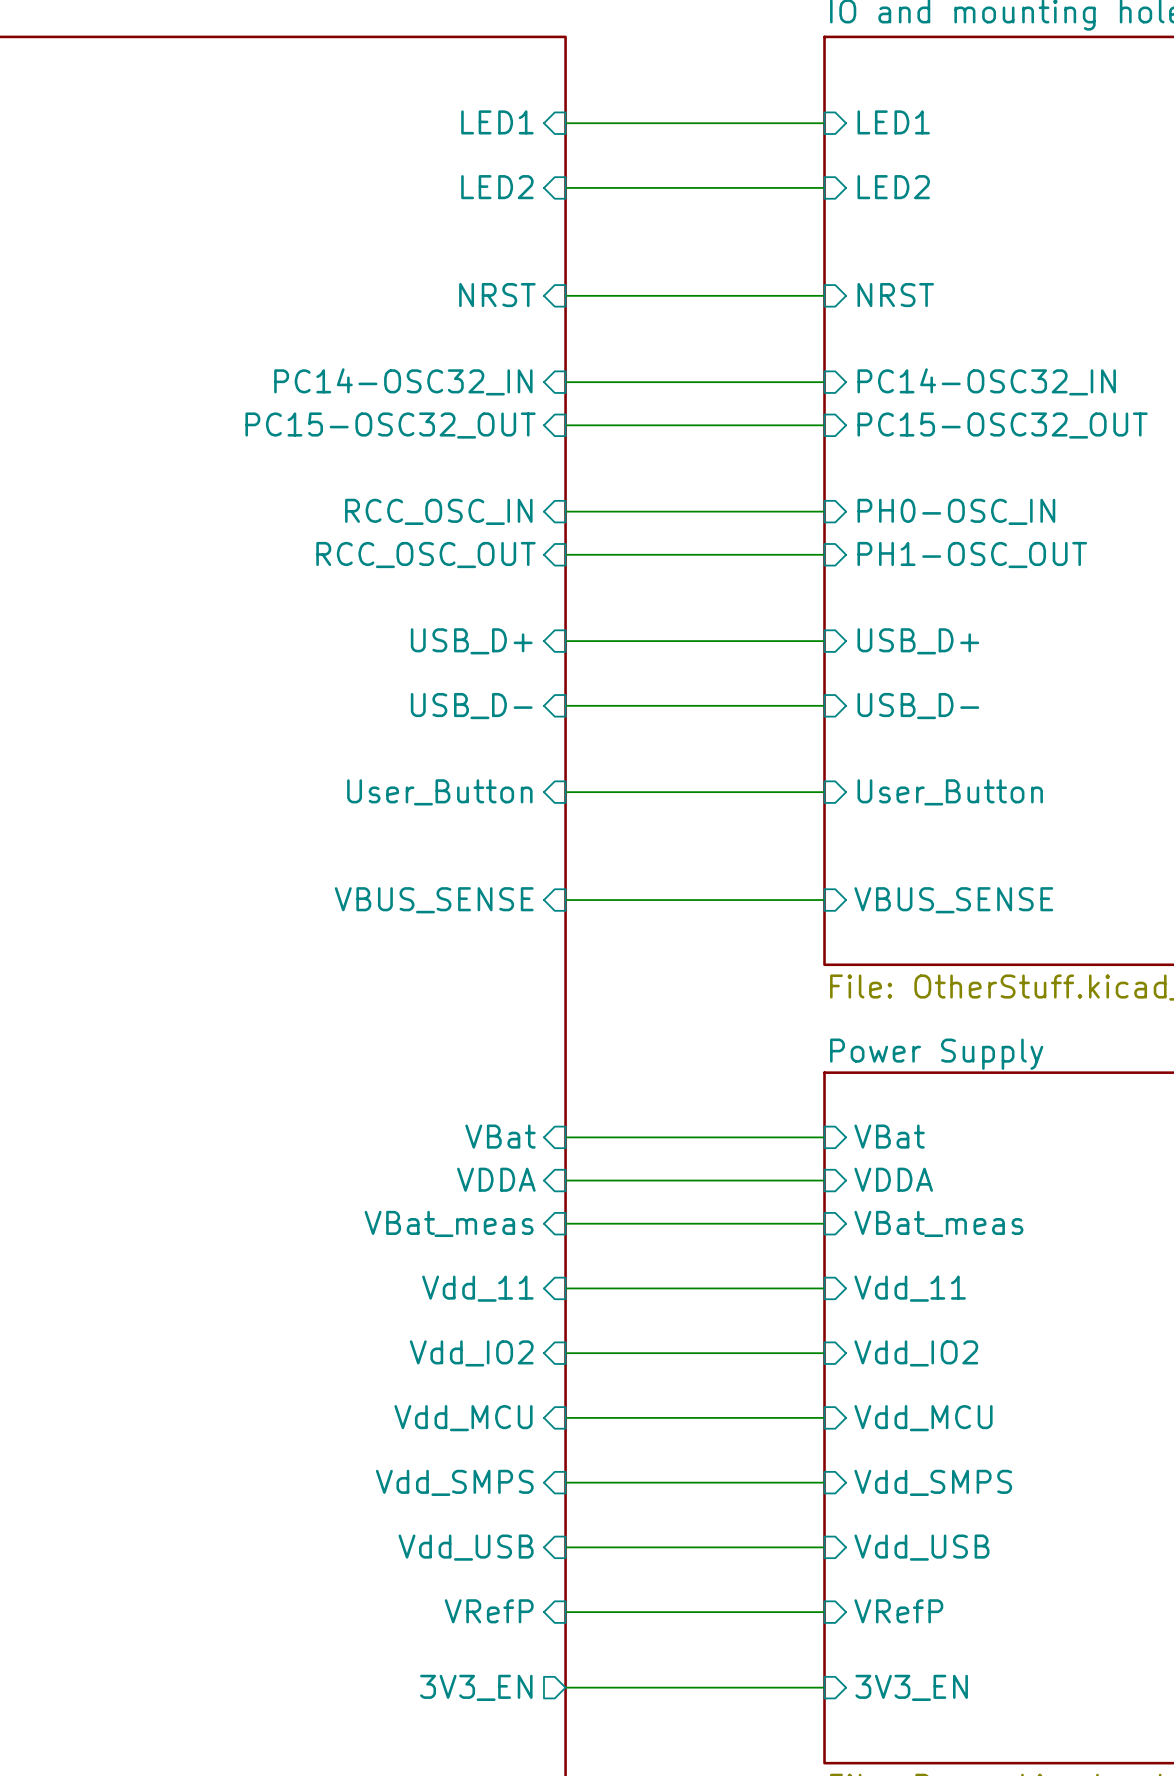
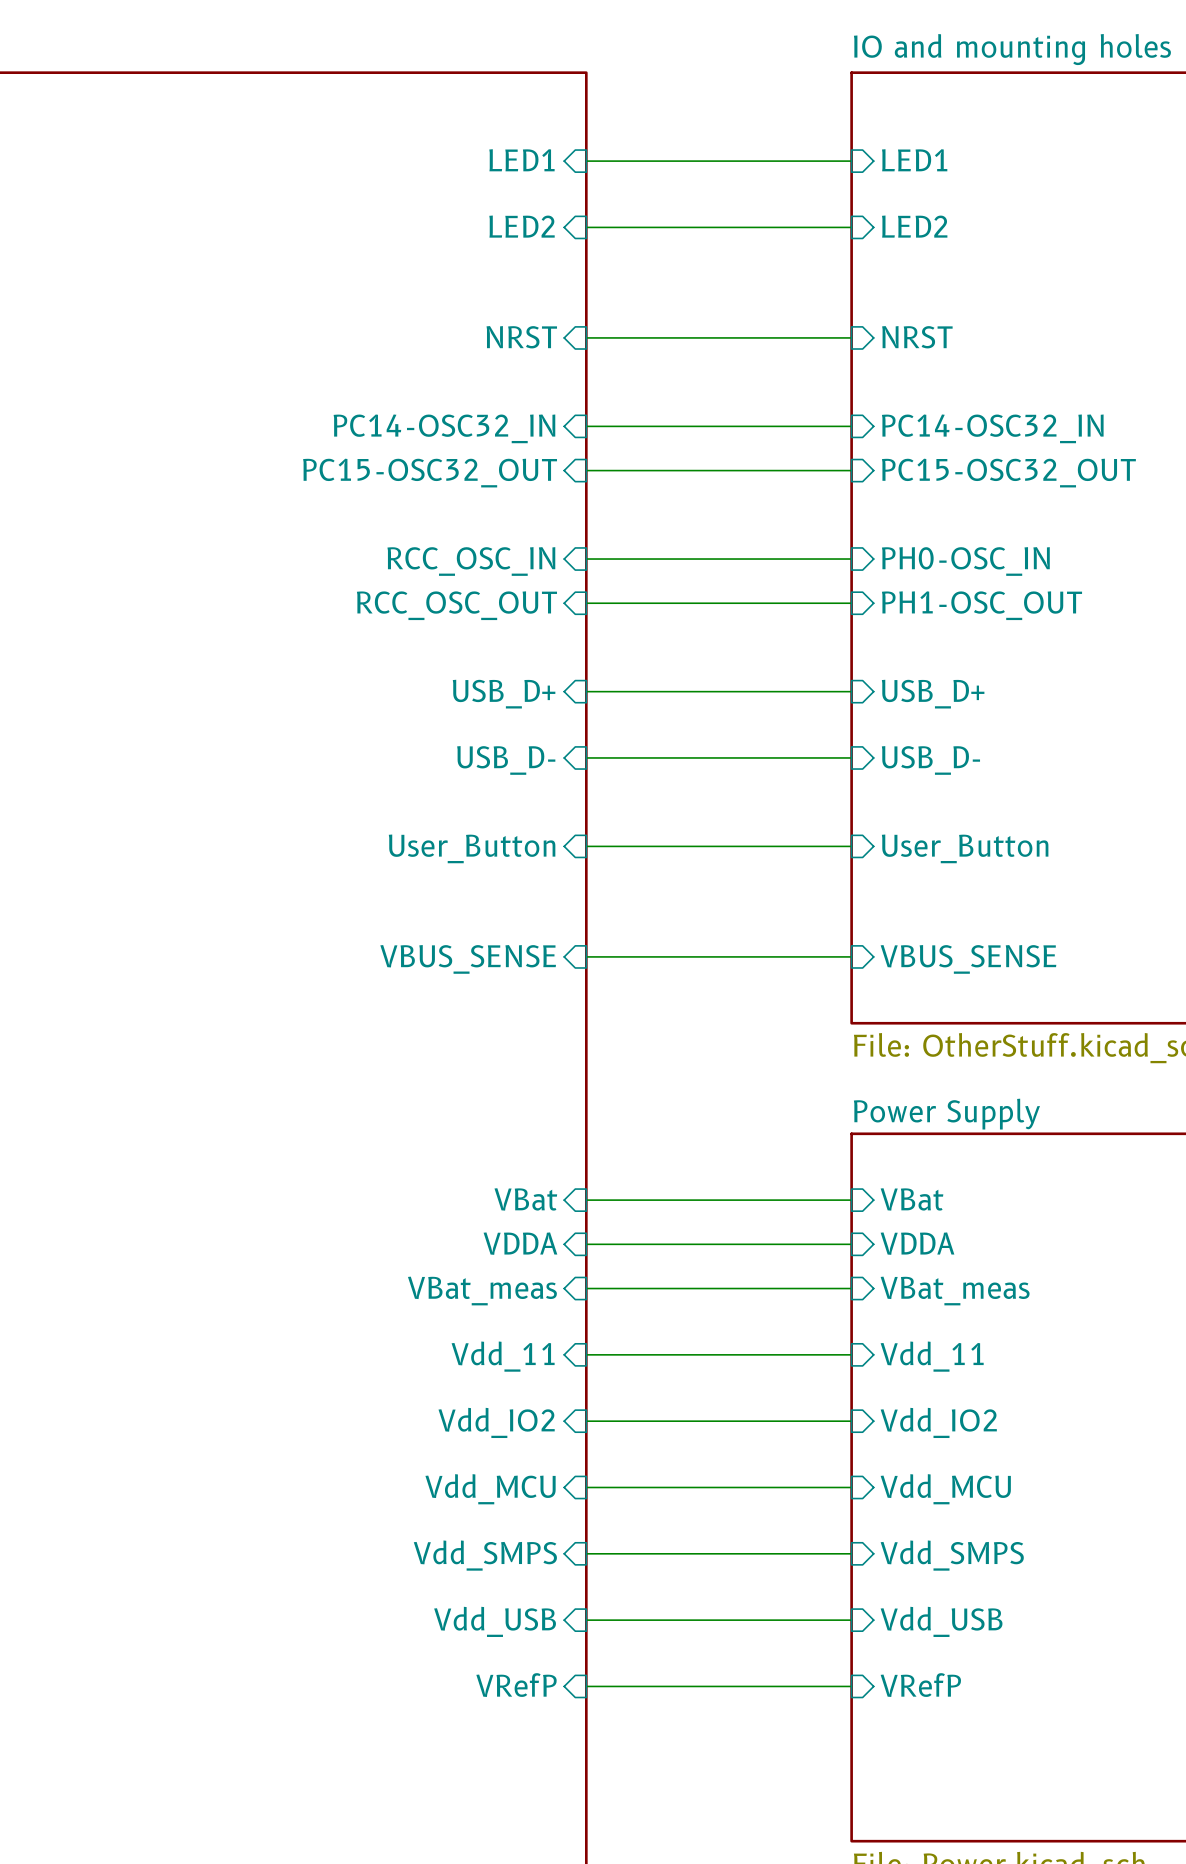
sheet pin: 3V3_EN (476, 1687) -> none
wire: (565, 1687) (824, 1687) -> none
sheet pin: 3V3_EN (911, 1687) -> none

